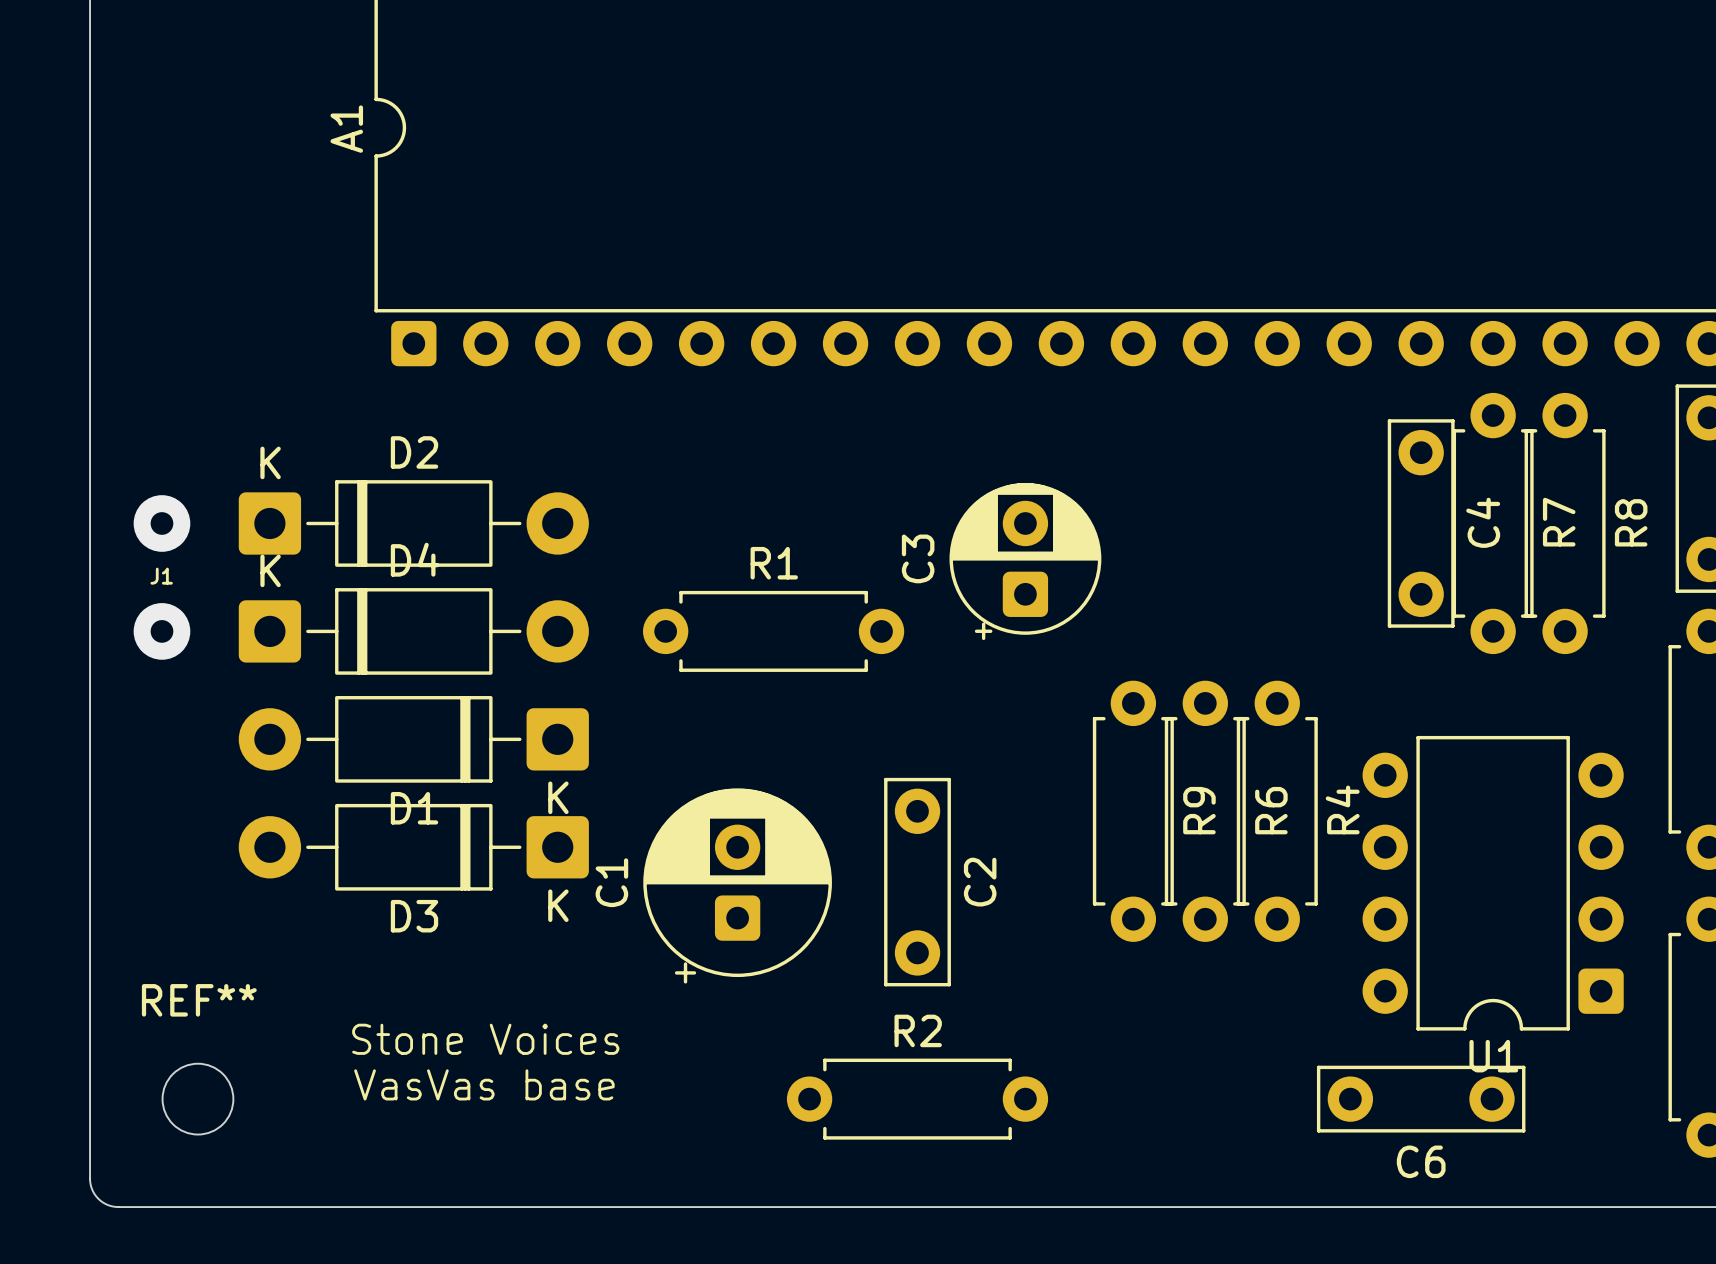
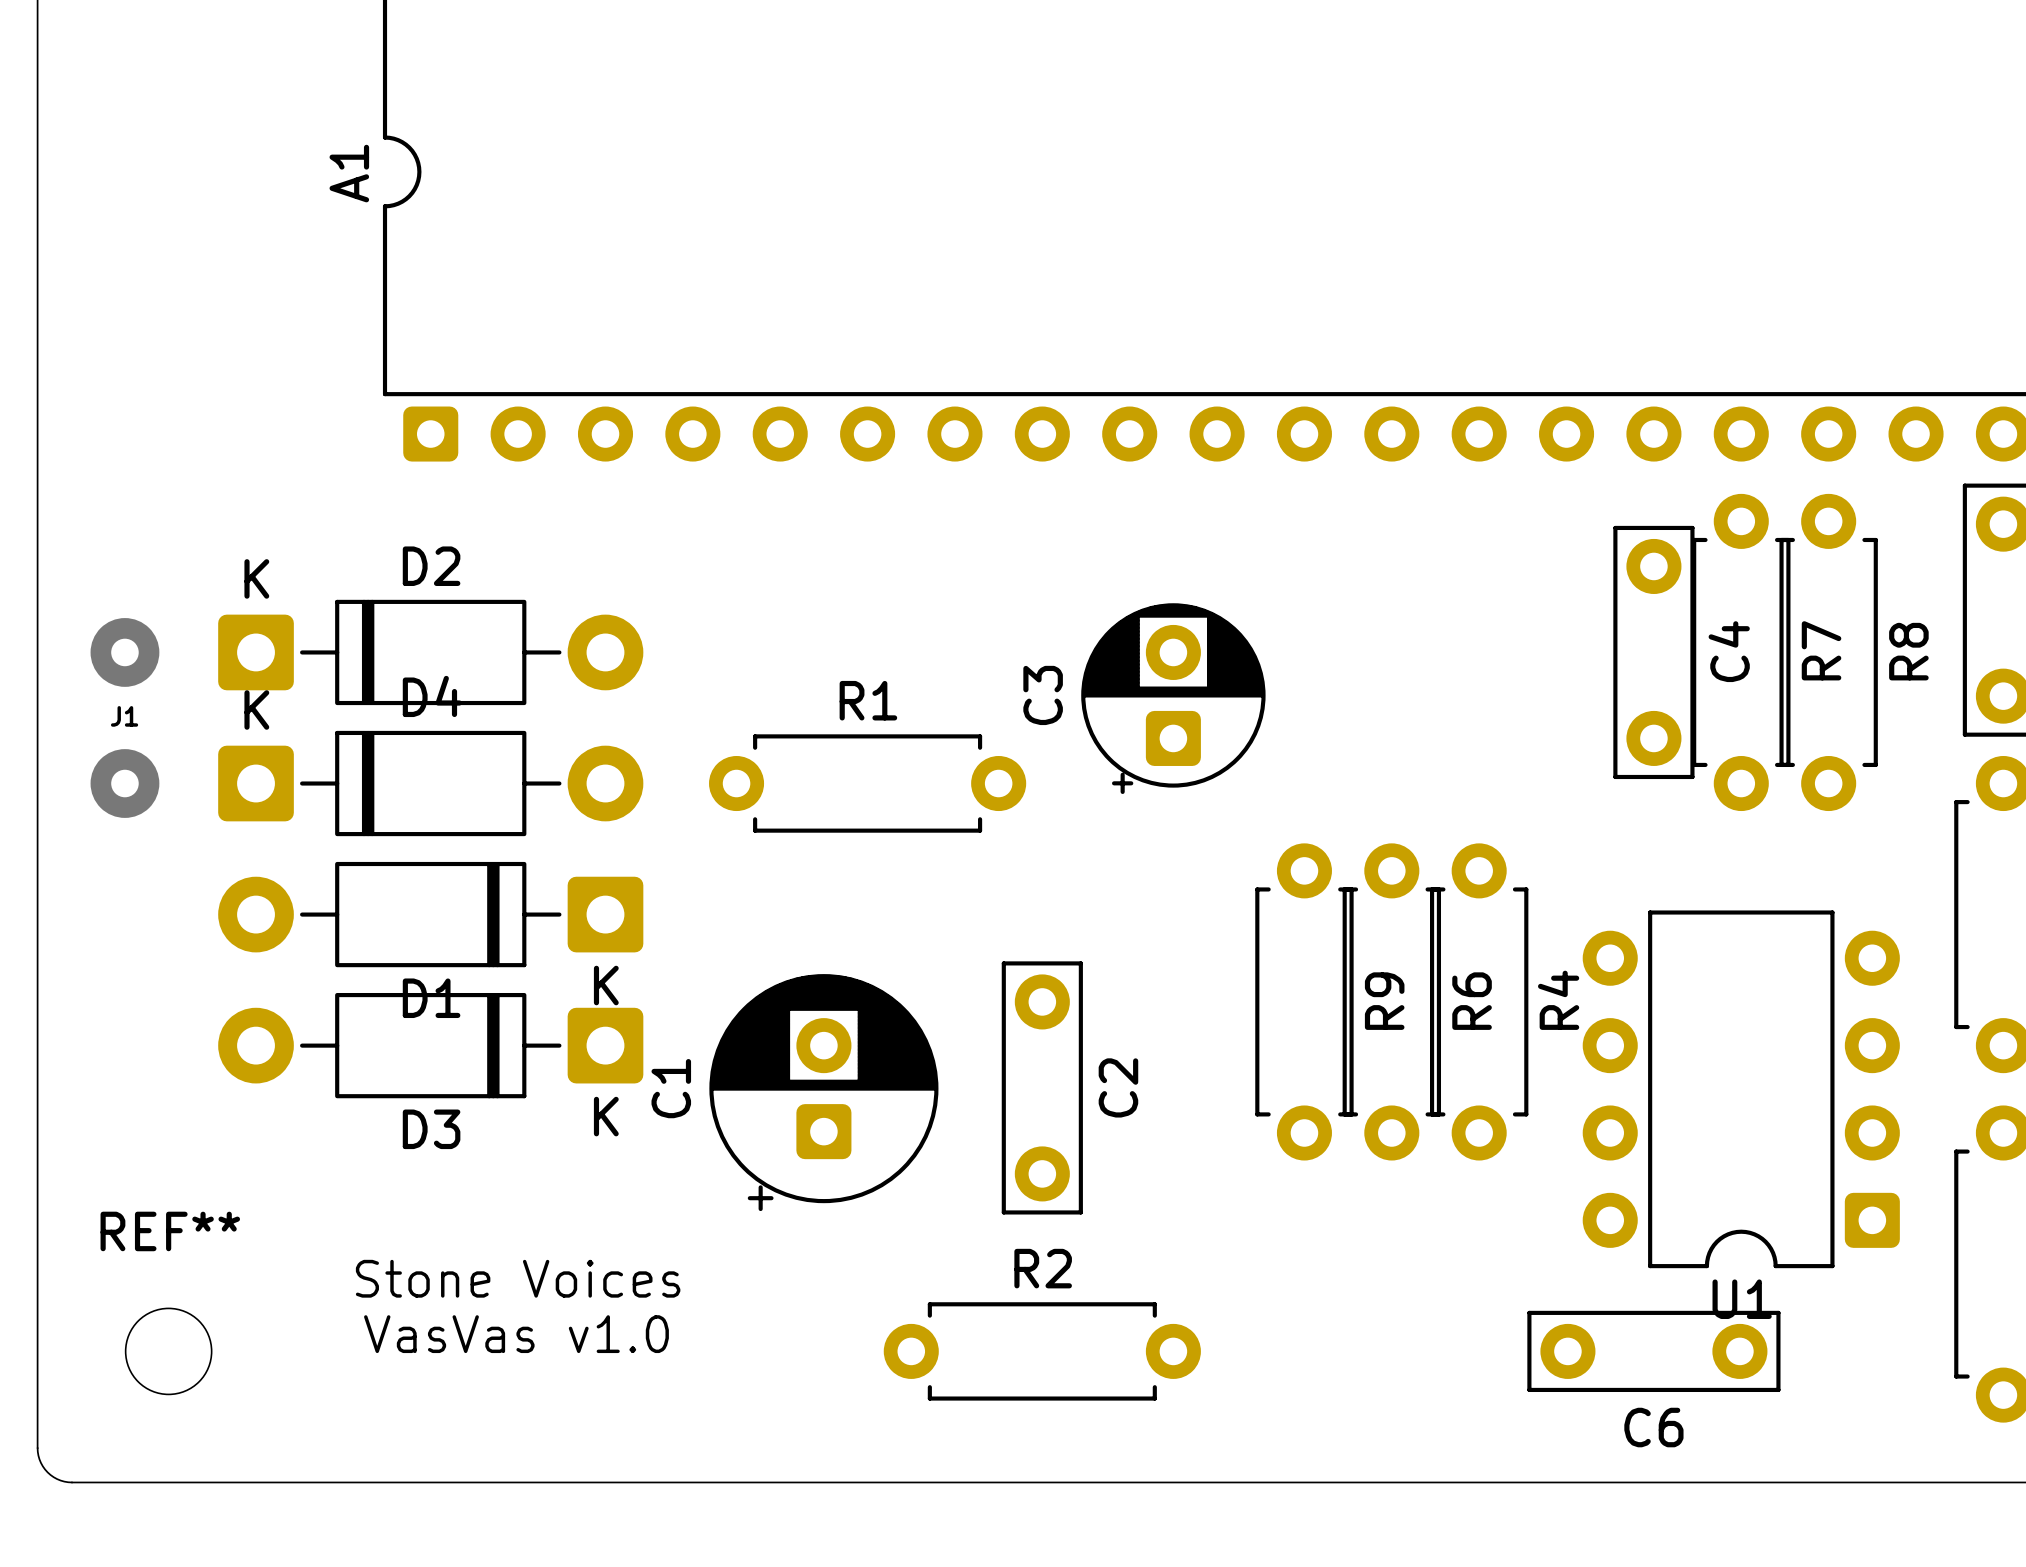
text: VasVas base (484, 1084) -> VasVas v1.0 (516, 1334)

